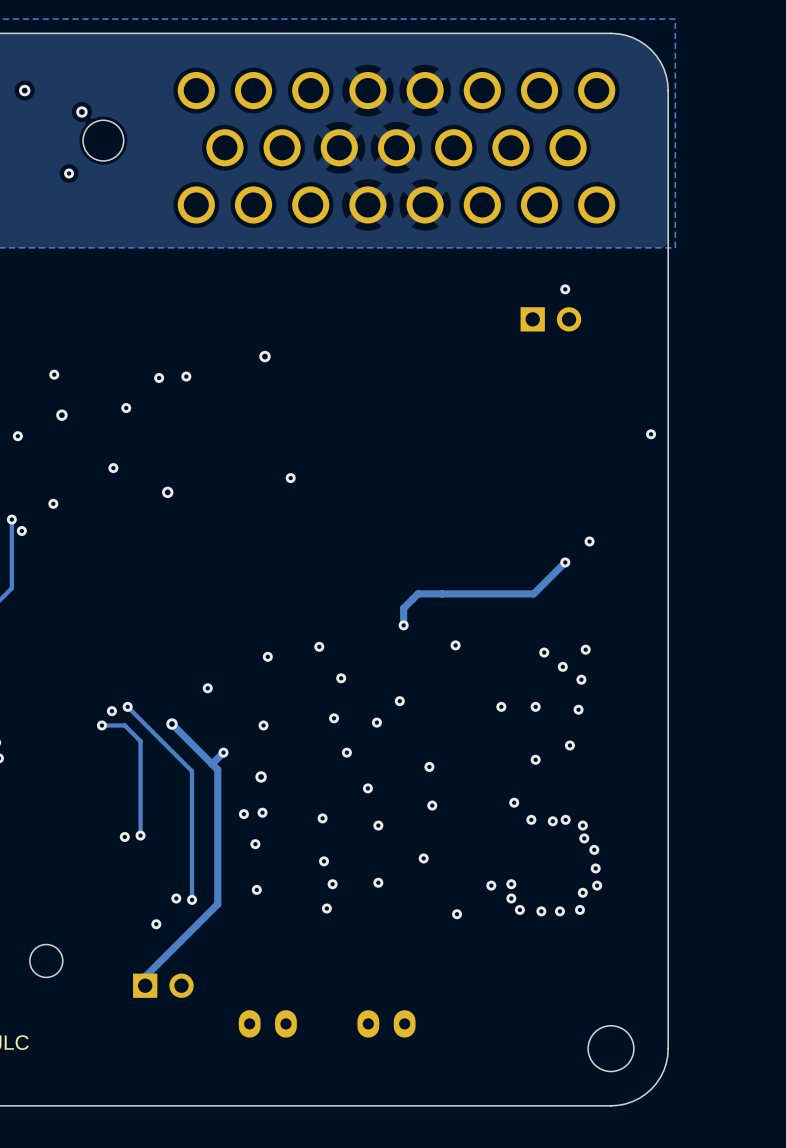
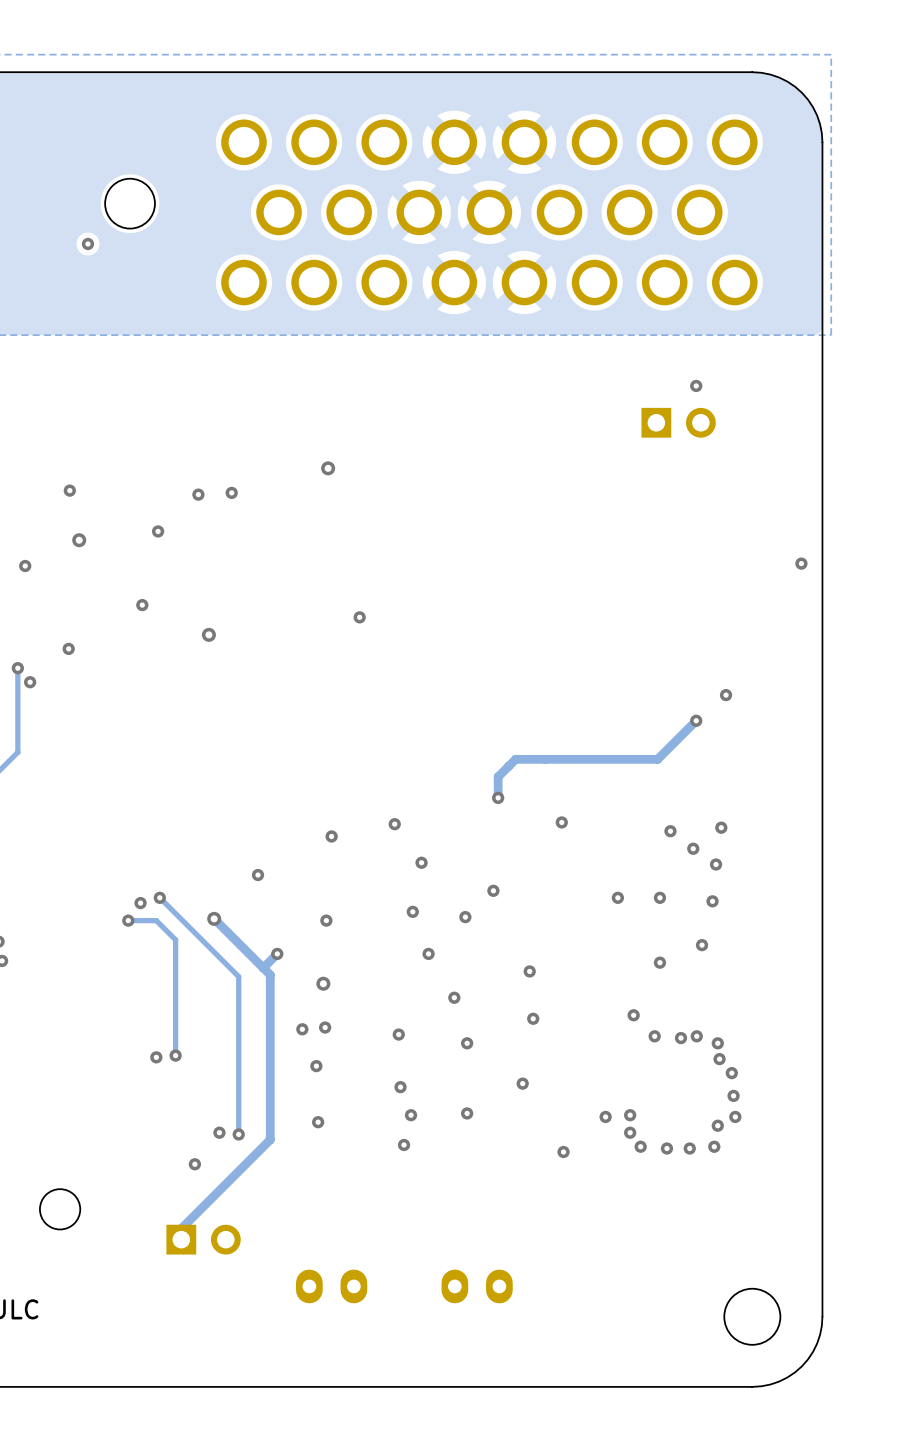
via: (24, 90) -> none
via: (81, 112) -> none

